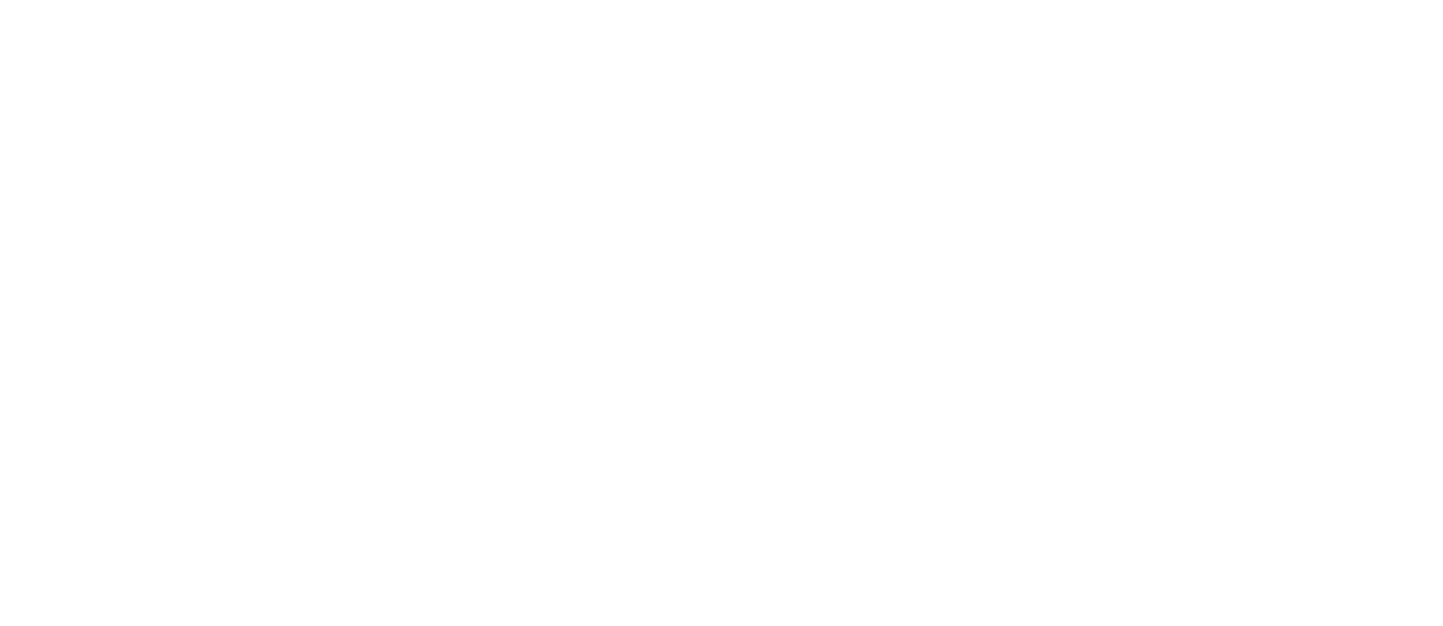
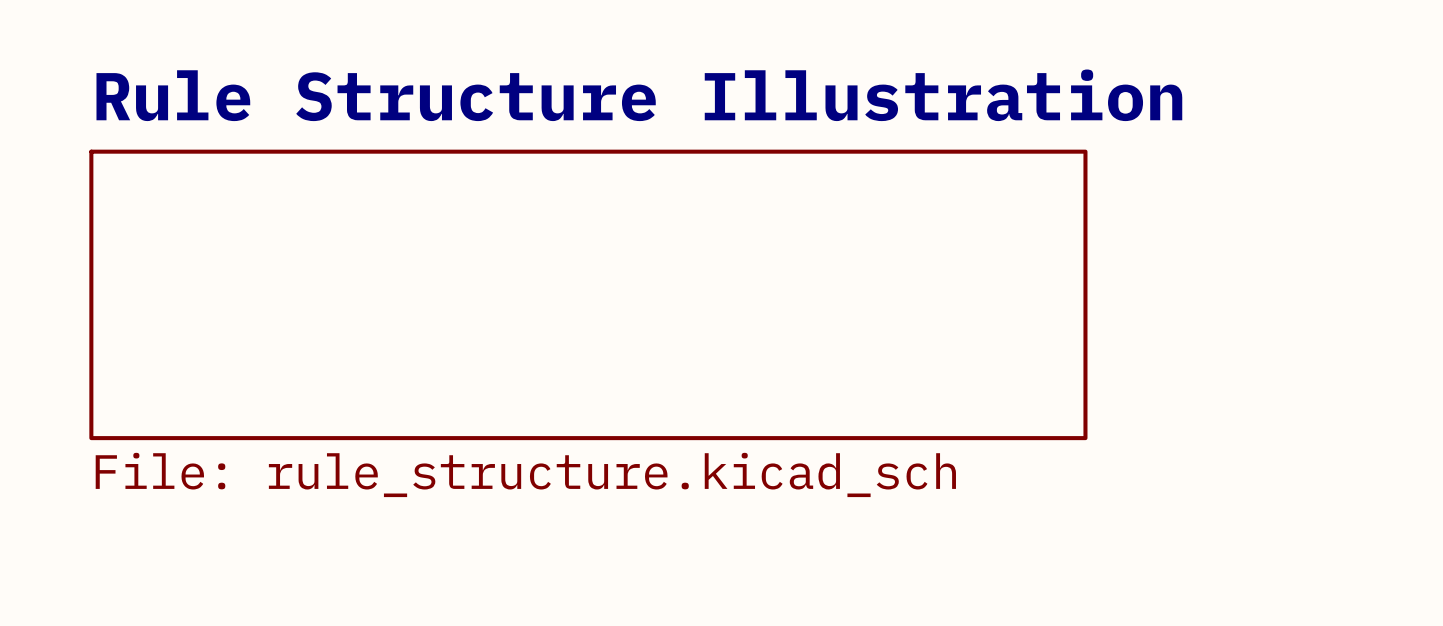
sheet Rule Structure Illustration: none -> File: rule_structure.kicad_sch (588, 294)

